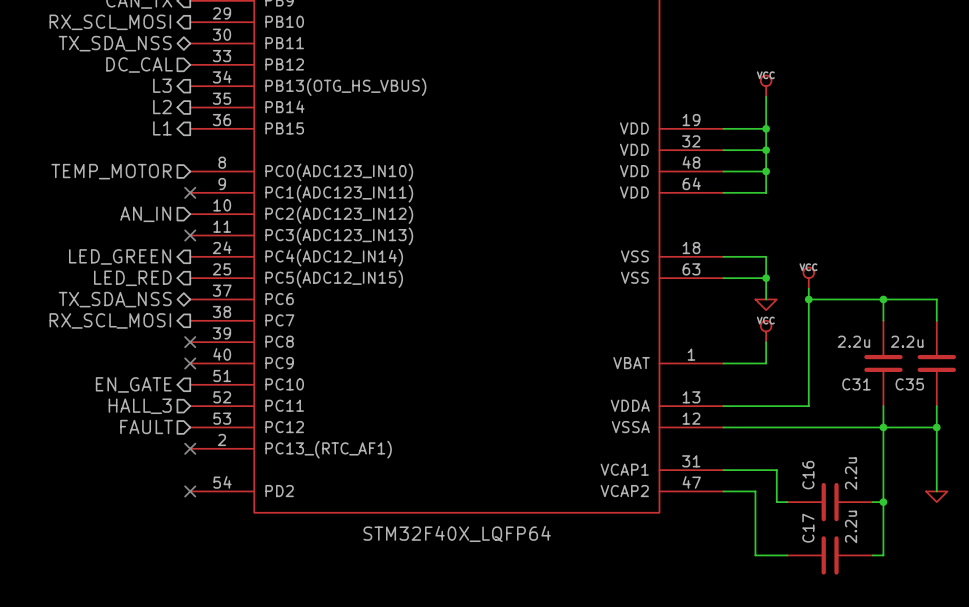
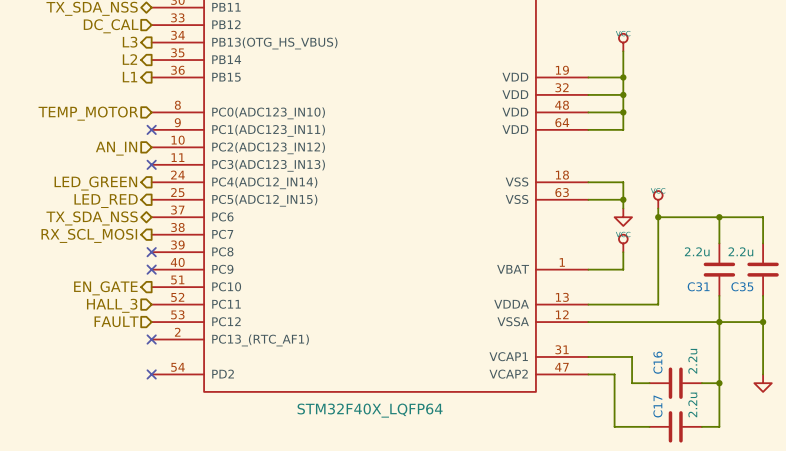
power symbol shape: [755, 299, 777, 311] -> [614, 208, 633, 226]
C31 symbol: [864, 320, 903, 407] -> [703, 243, 736, 296]
C35 symbol: [917, 320, 956, 407] -> [747, 243, 779, 296]
C16 symbol: [787, 482, 873, 522] -> [649, 367, 702, 399]
power symbol shape: [926, 491, 948, 503] -> [754, 374, 772, 392]
C17 symbol: [787, 536, 873, 575] -> [649, 411, 702, 443]

